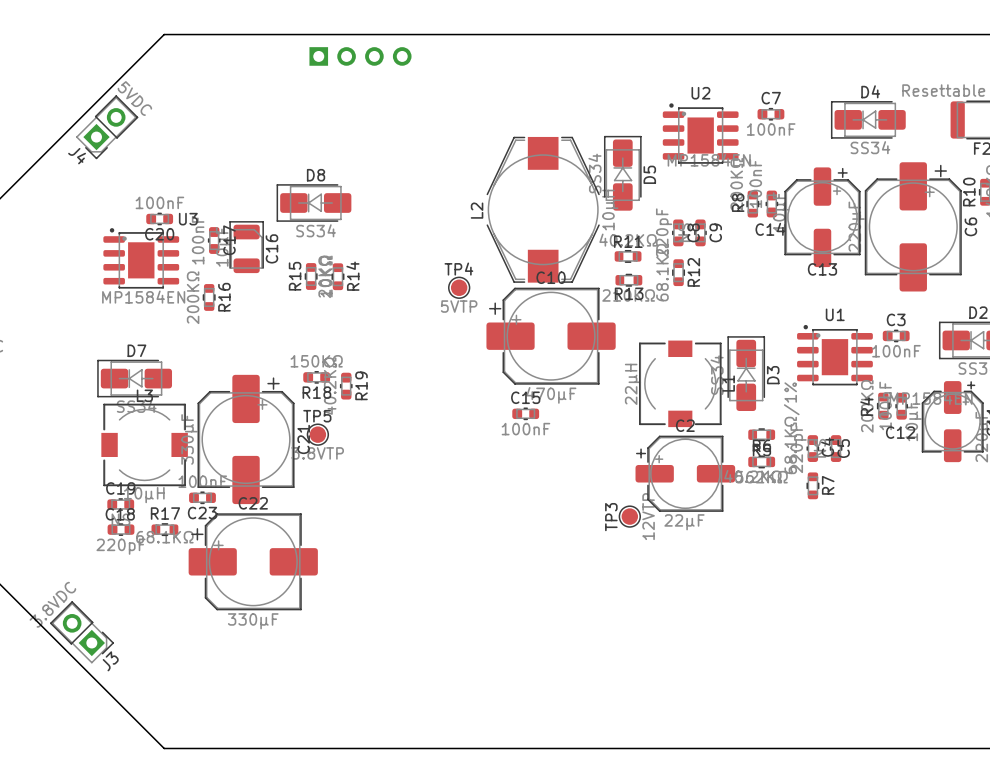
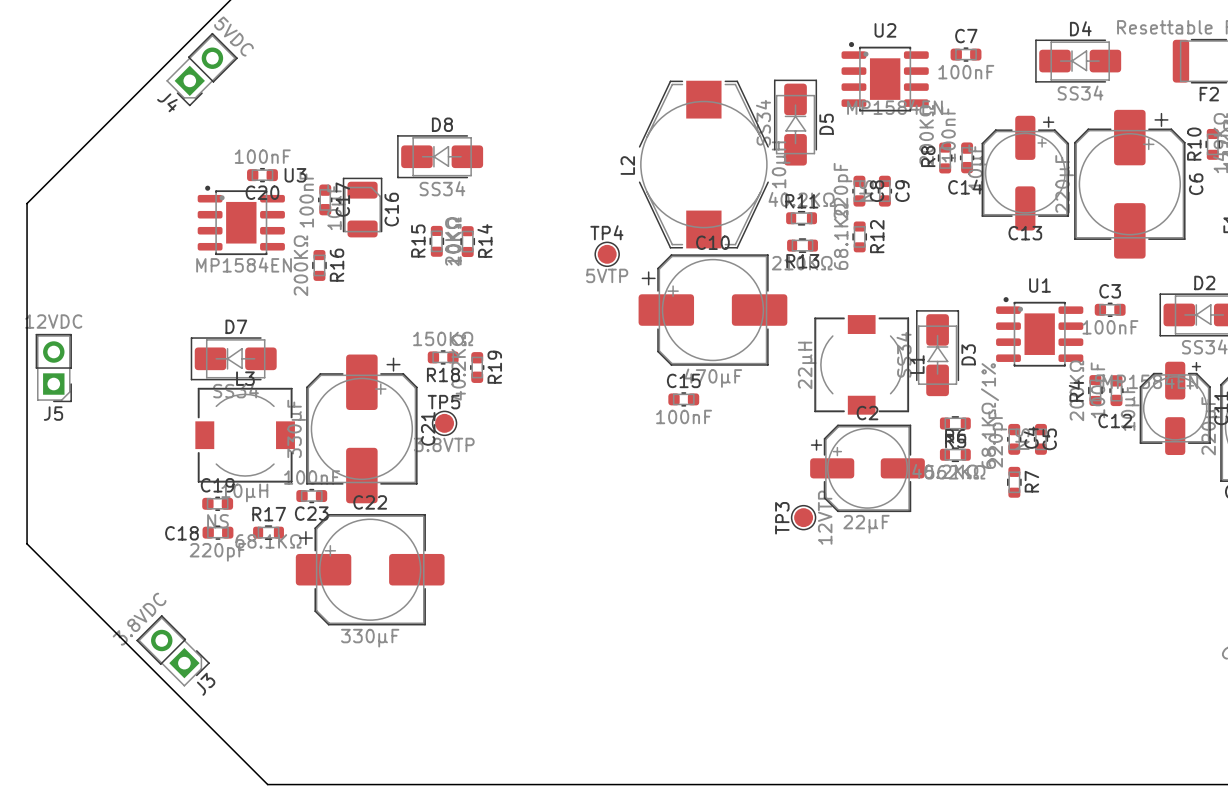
C18 name position: C18 (120, 514) -> C18 (181, 533)

